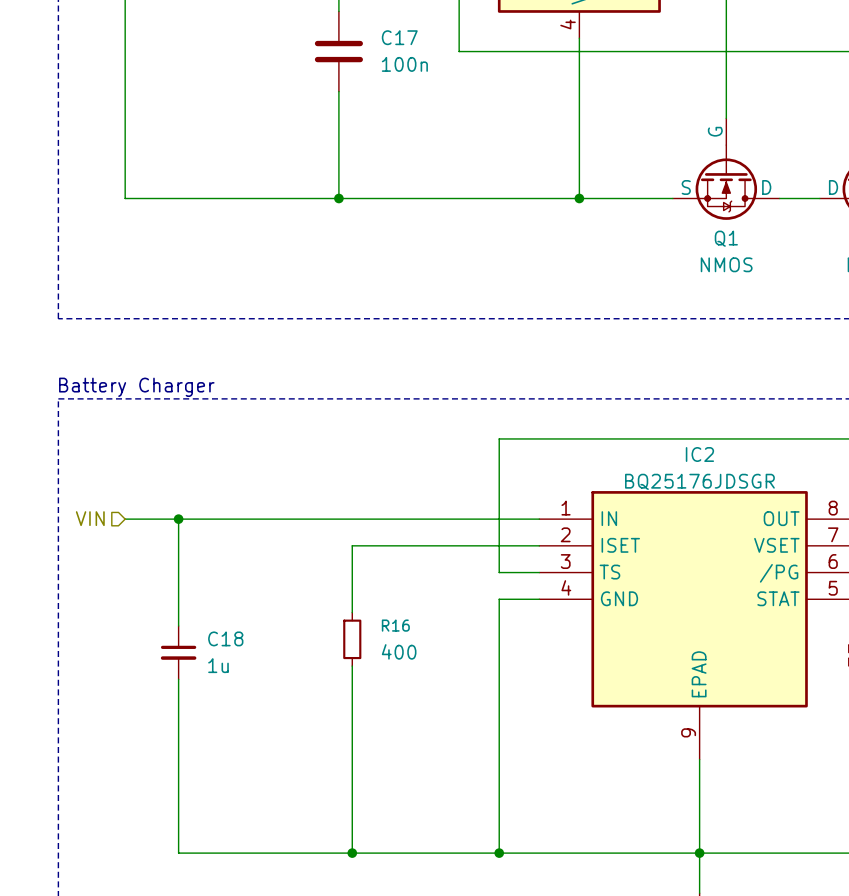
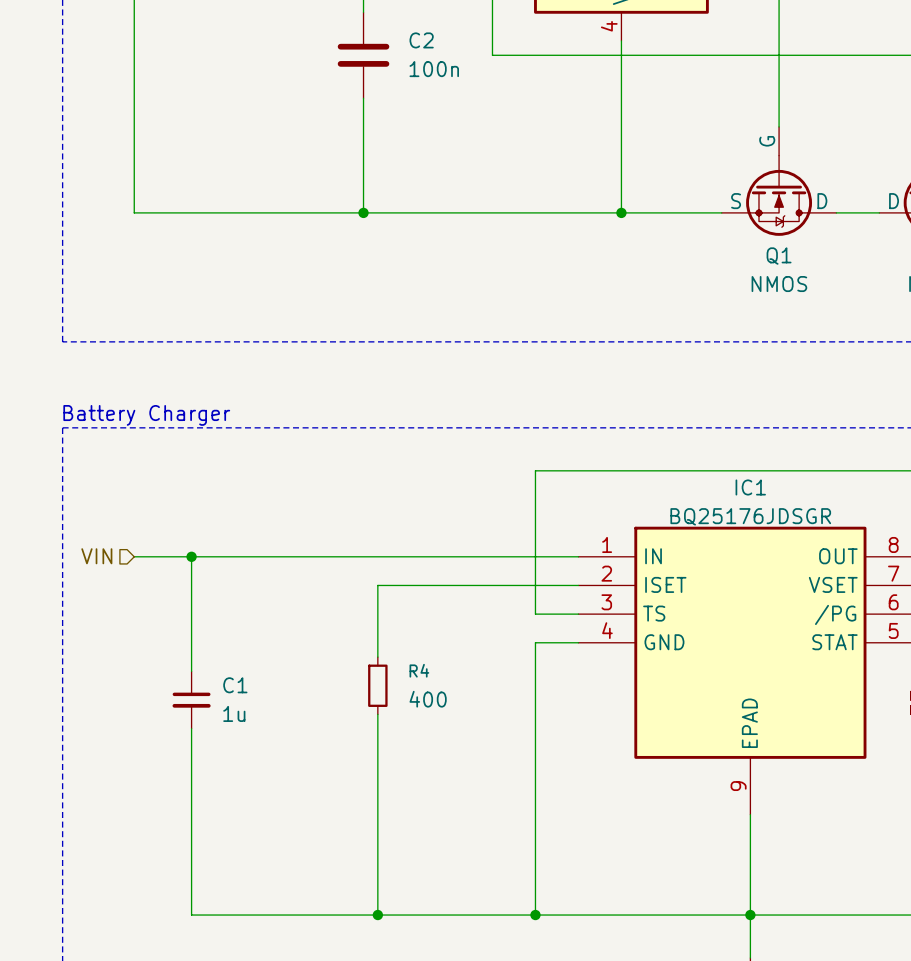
C17 name: C17 (399, 37) -> C2 (421, 40)
IC2 name: IC2 (699, 454) -> IC1 (750, 487)
R16 name: R16 (395, 625) -> R4 (419, 670)
C18 name: C18 (225, 638) -> C1 (235, 685)

